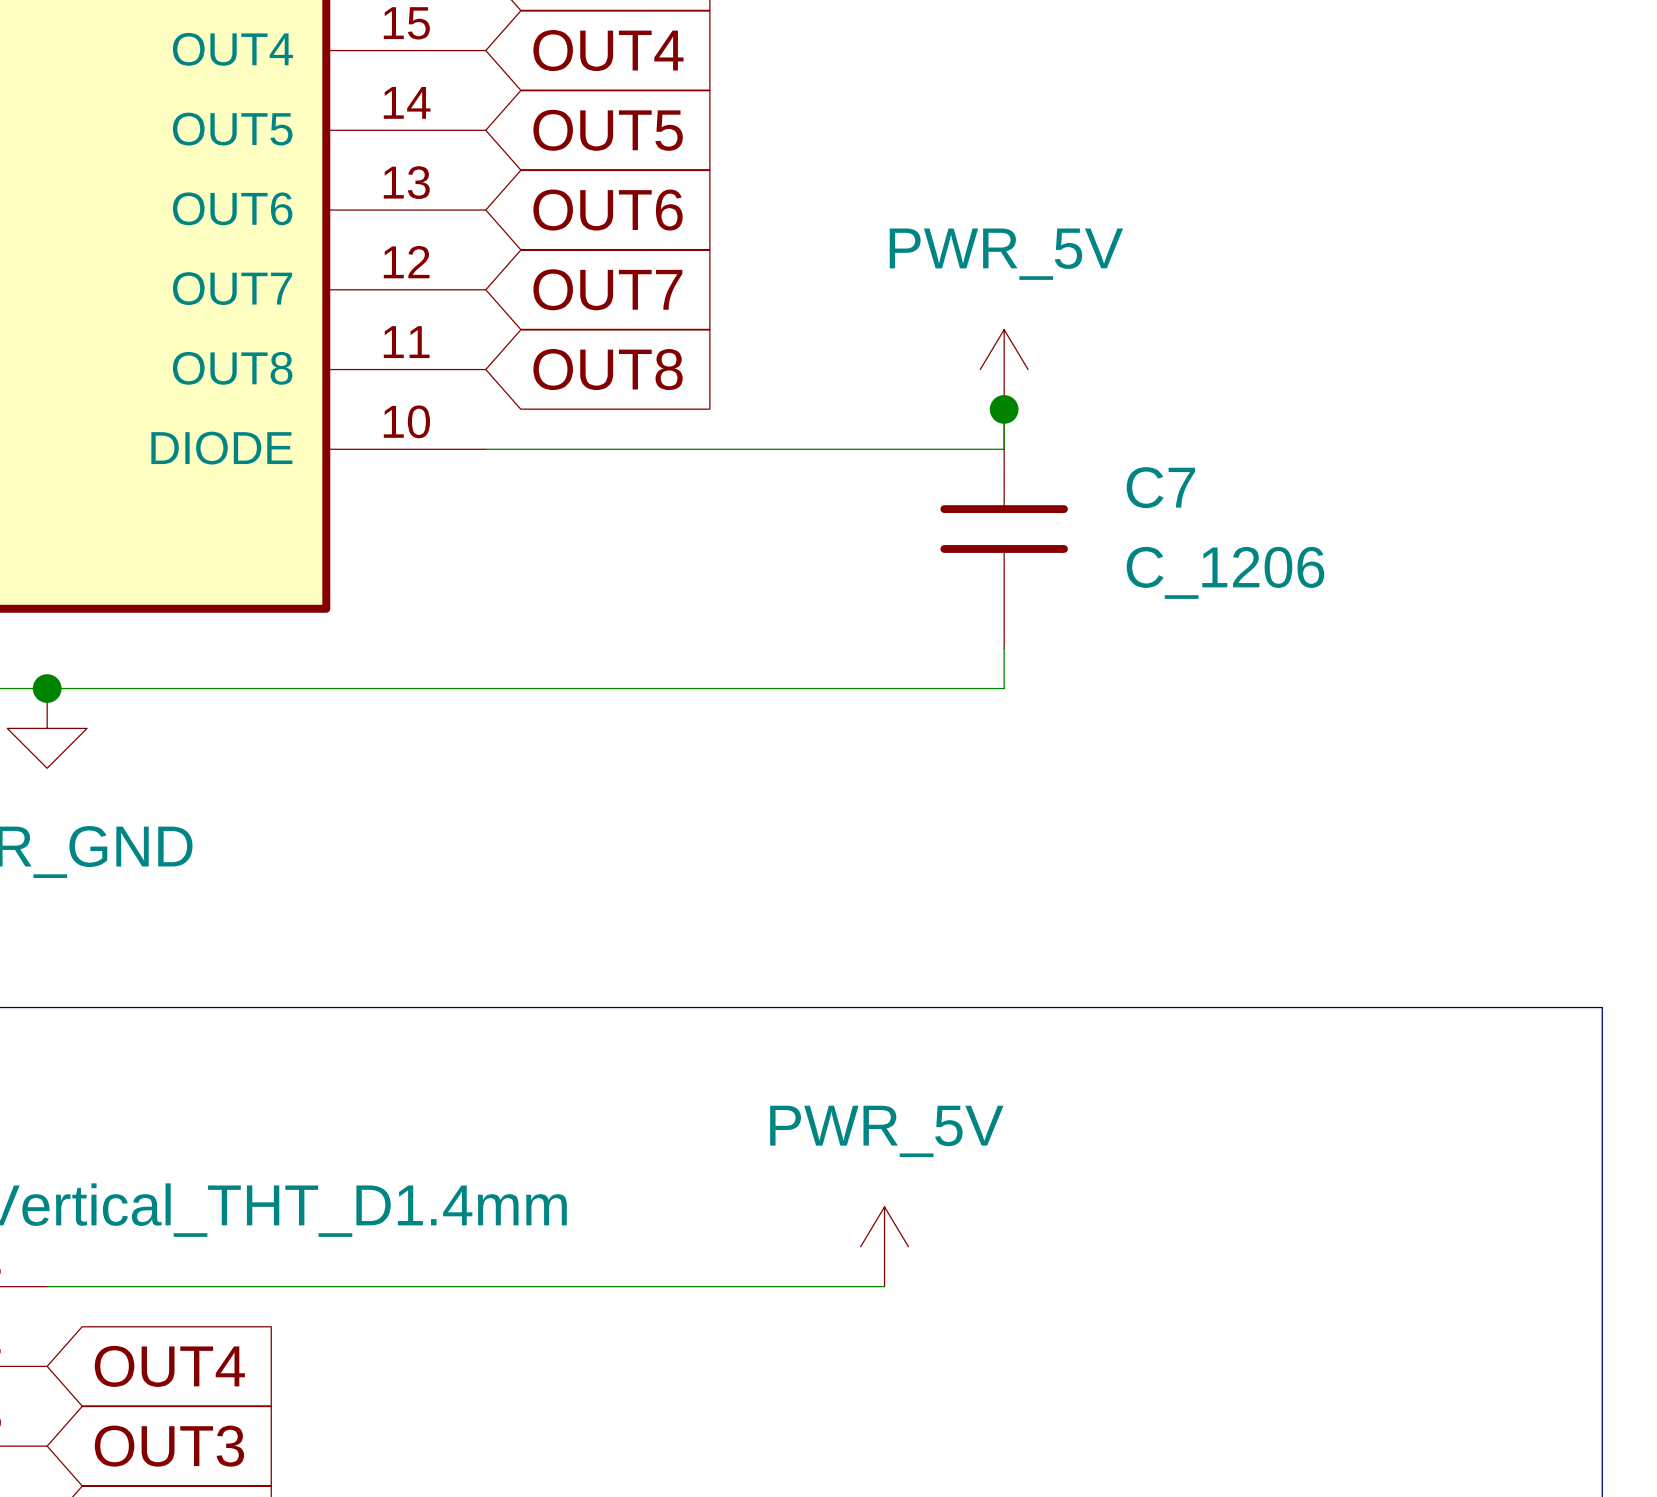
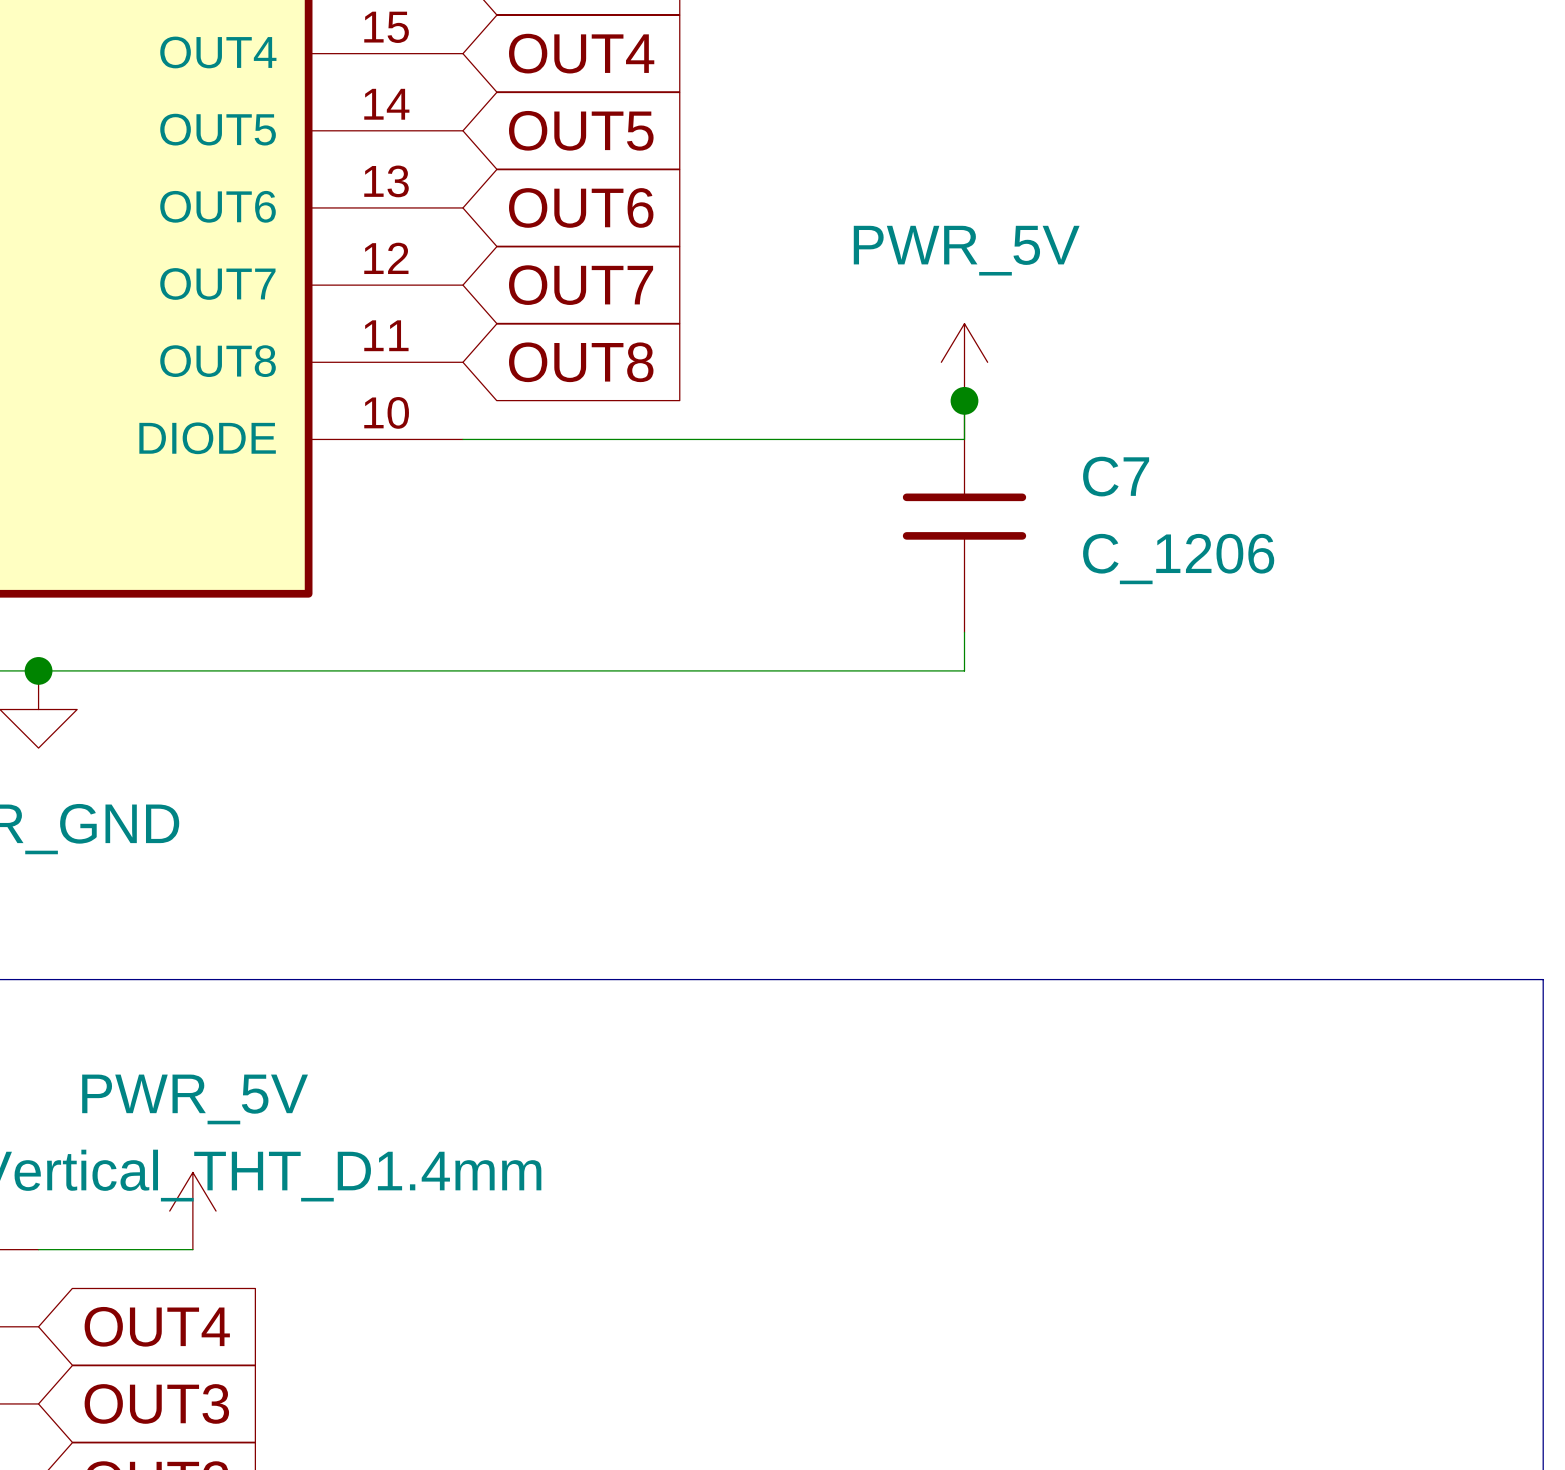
power symbol position: PWR_5V (884, 1246) -> PWR_5V (192, 1211)
wire: (206, 1286) (884, 1286) -> none

